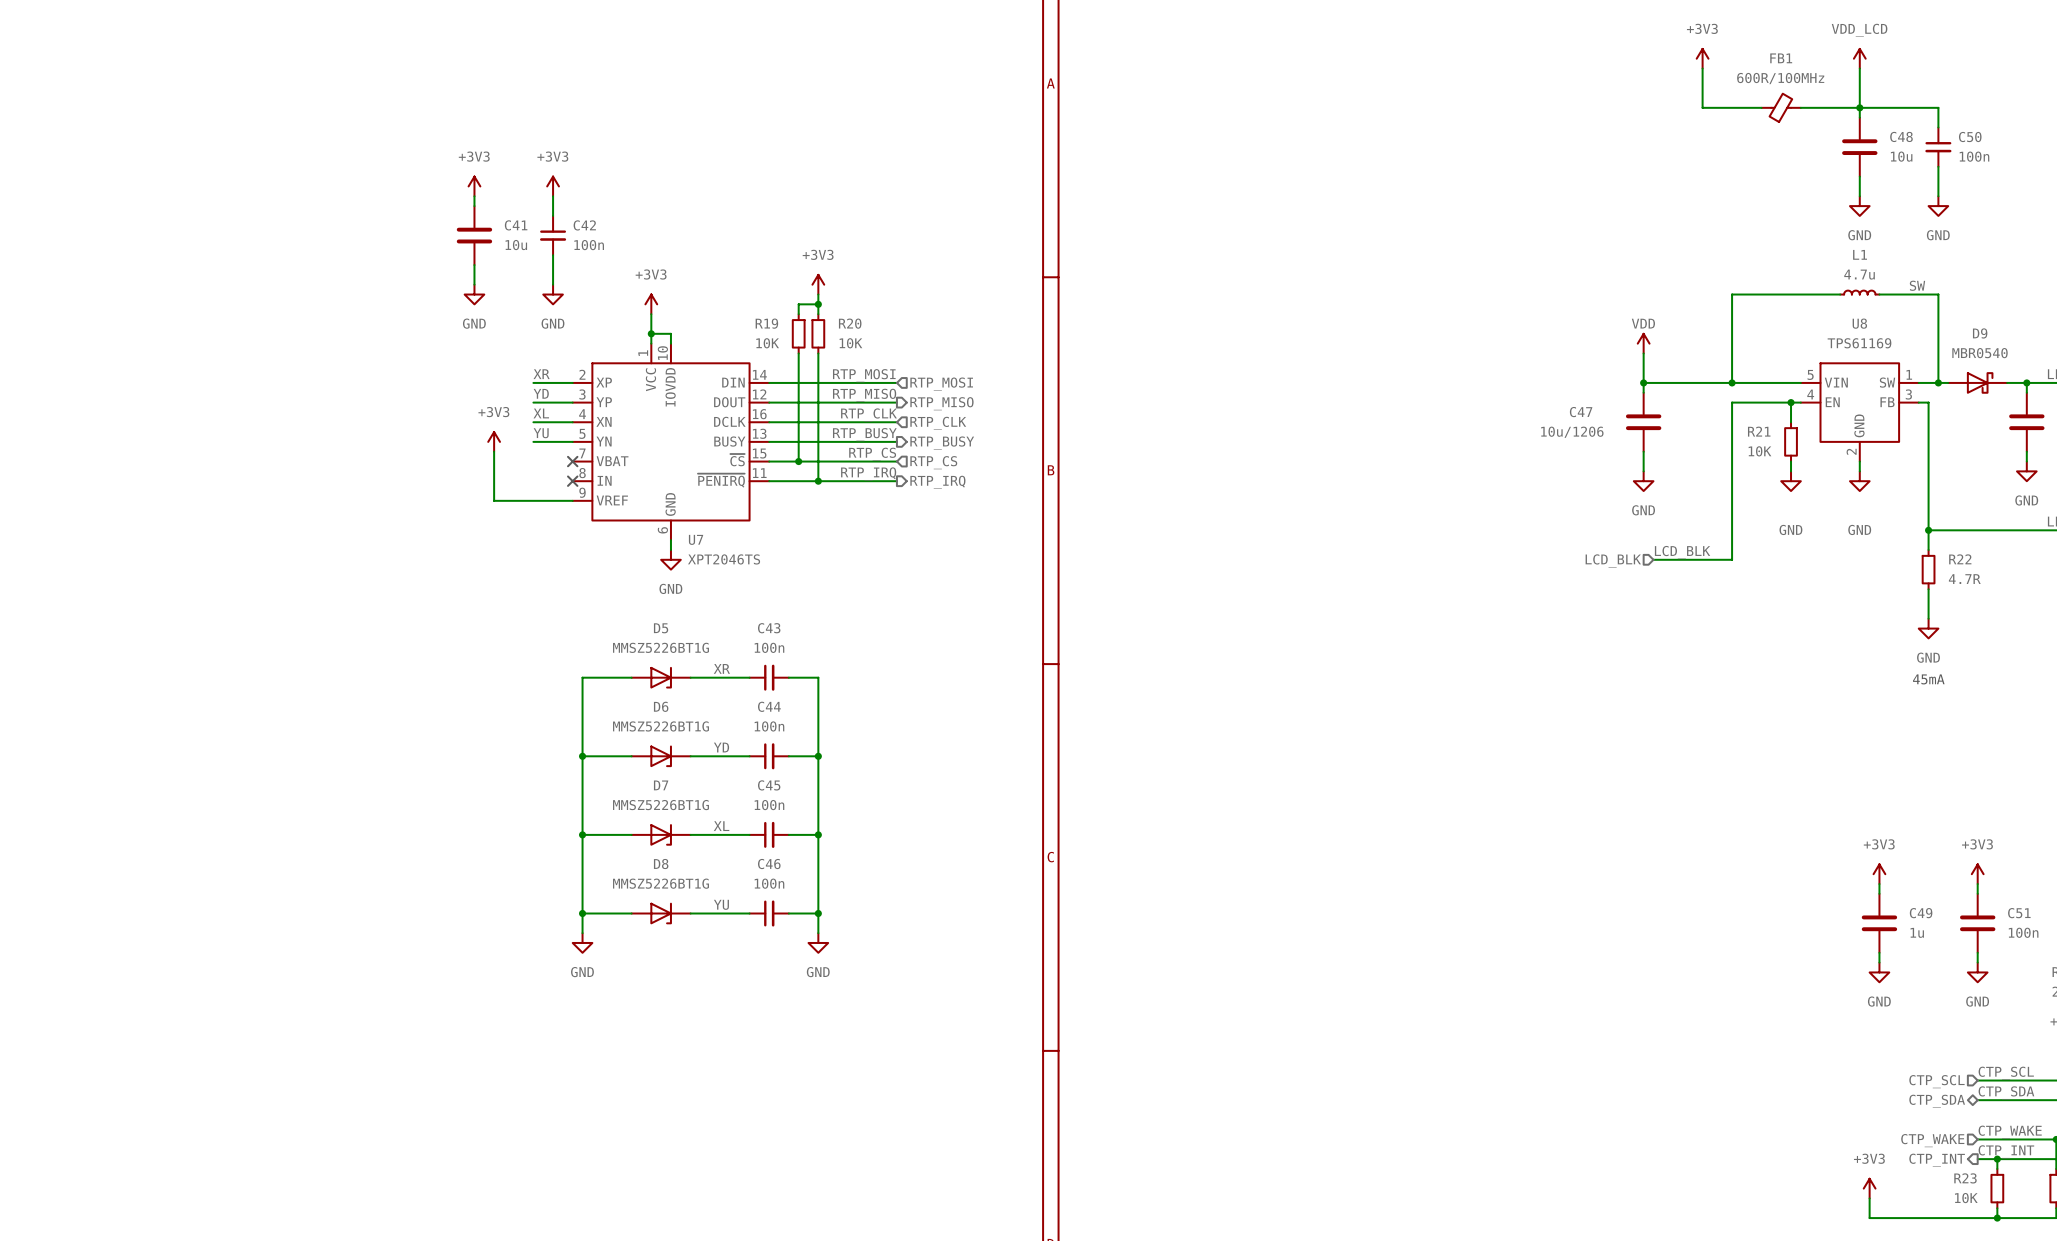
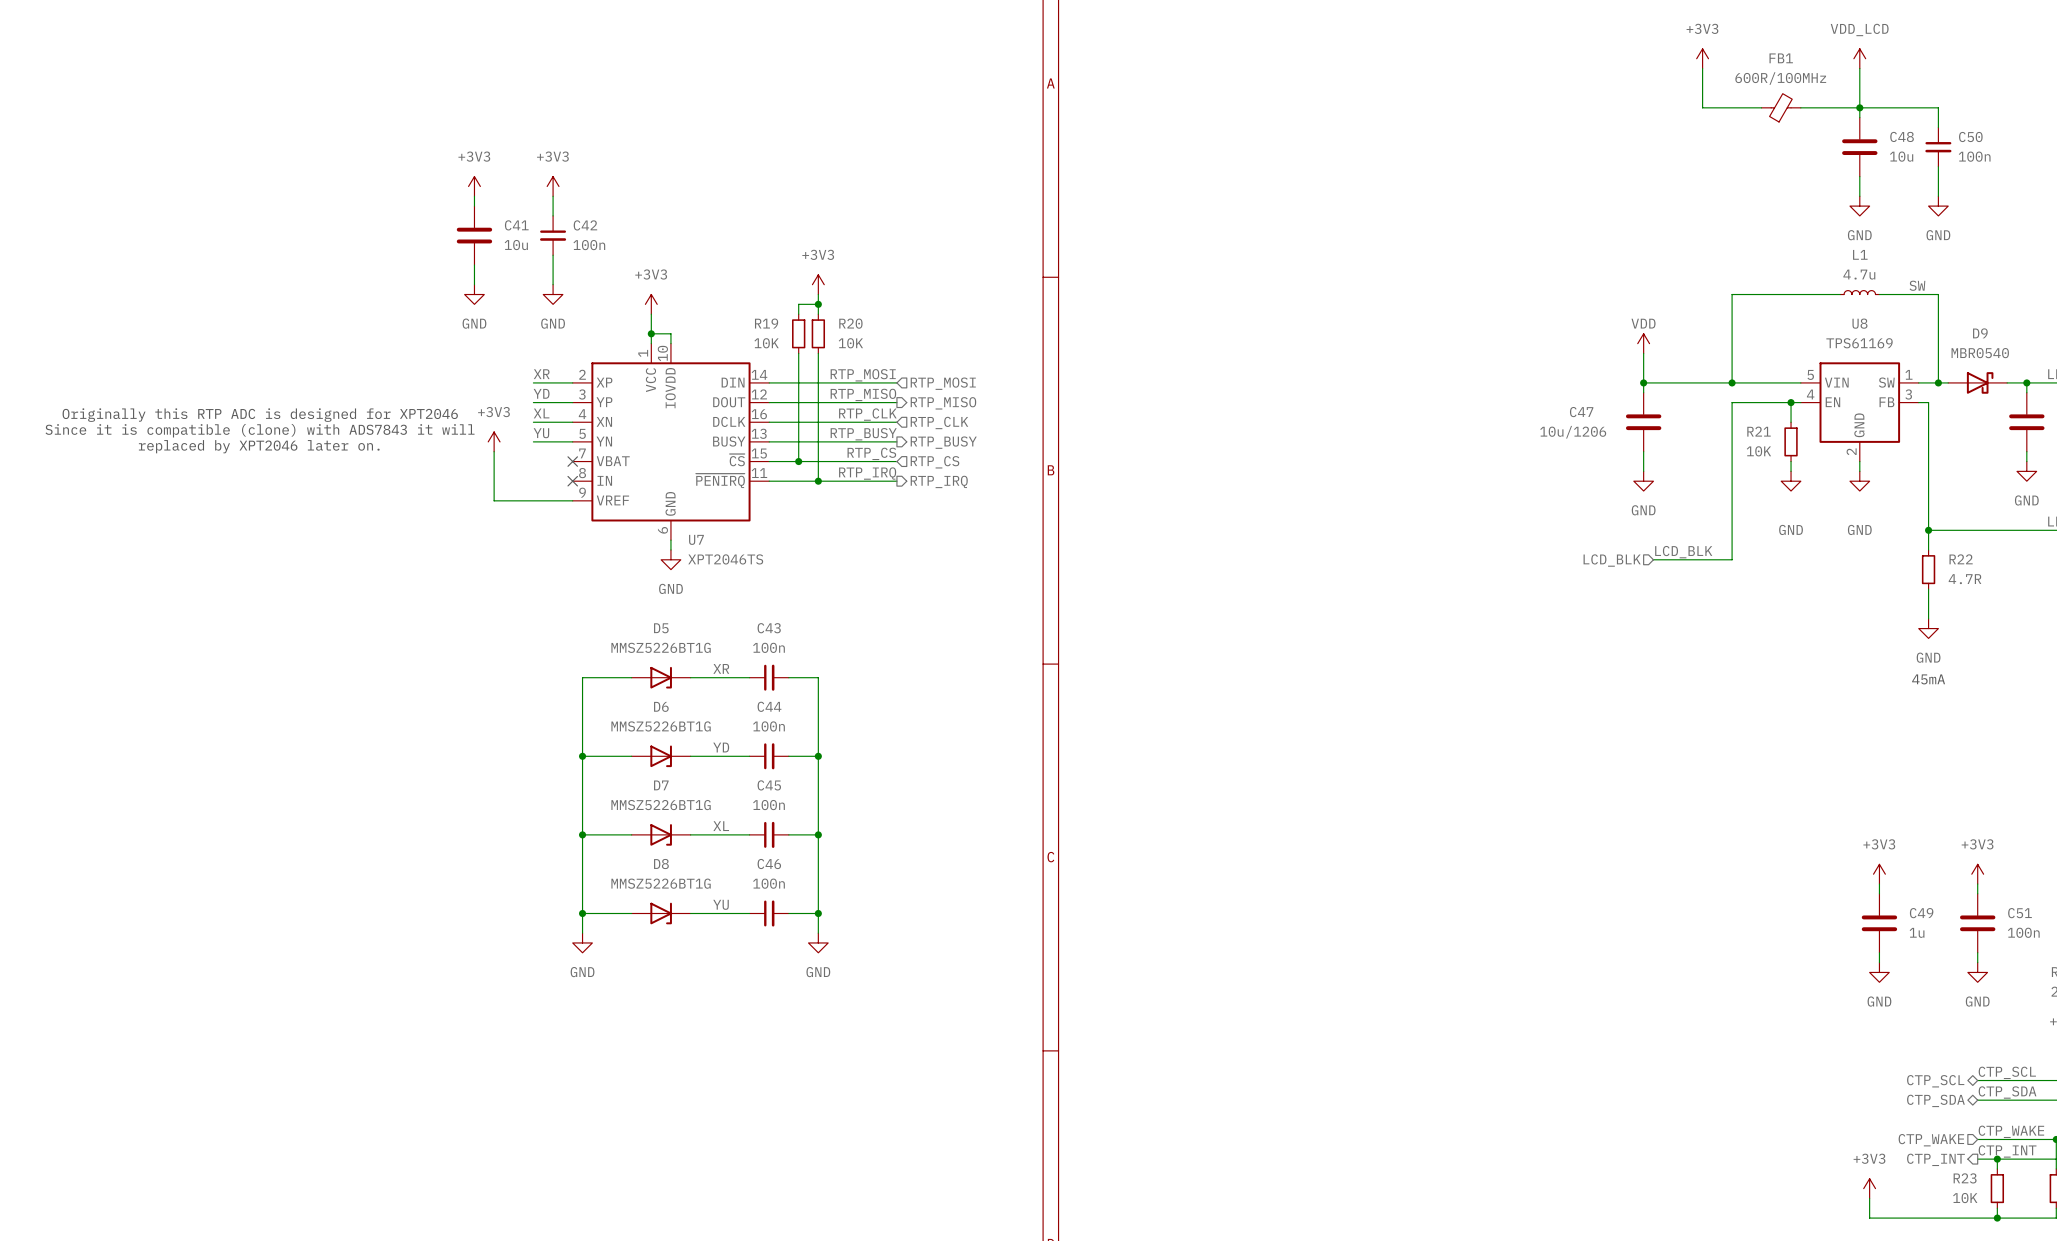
text: none -> Originally this RTP ADC is designed for XPT2046 (260, 415)
text: none -> Since it is compatible (clone) with ADS7843 it will (260, 430)
text: none -> replaced by XPT2046 later on. (259, 446)
hierarchical label shape: input (1936, 1081) -> bidirectional (1935, 1081)

